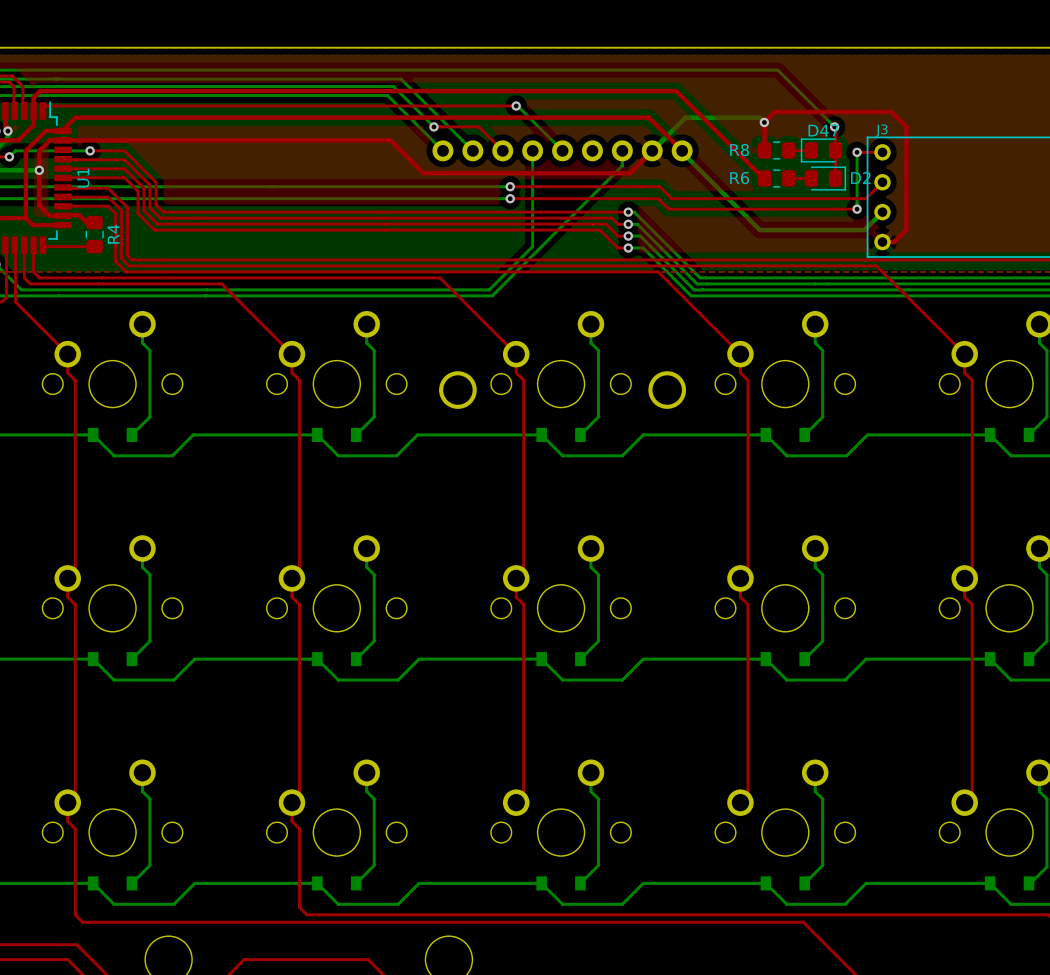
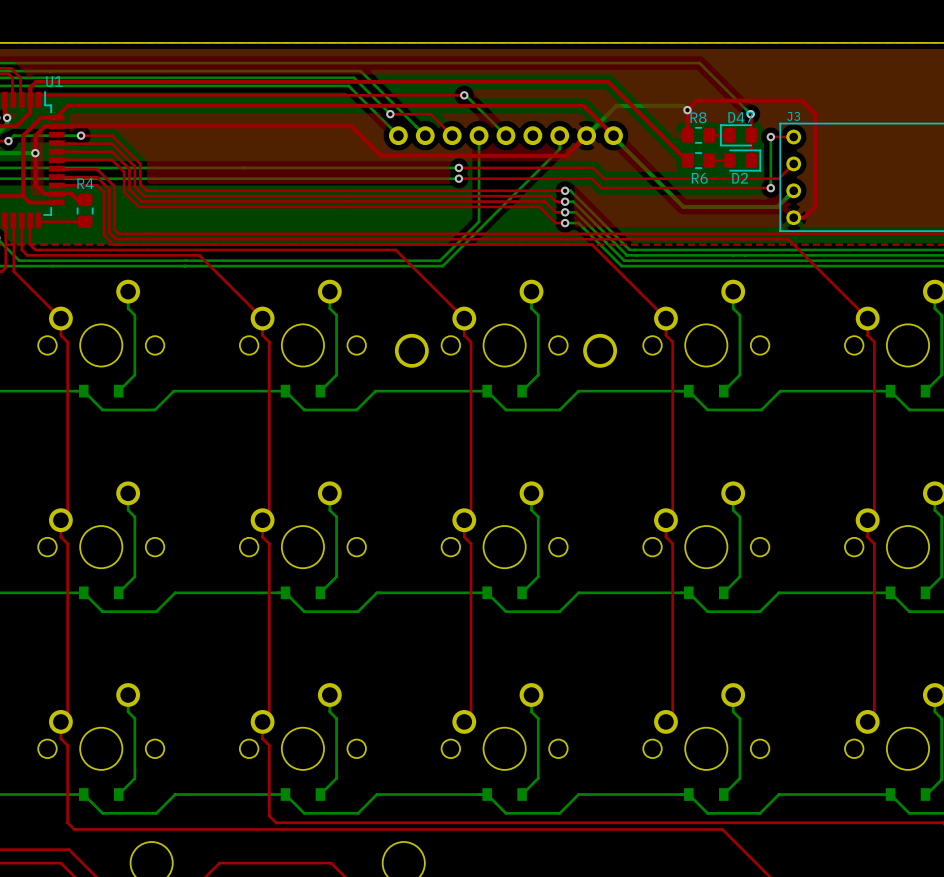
R8 name position: R8 (739, 150) -> R8 (698, 117)
D2 name position: D2 (860, 177) -> D2 (740, 178)
U1 name rotation: 0° (83, 178) -> 90° clockwise (54, 81)
U1 name position: U1 (83, 178) -> U1 (54, 81)
R6 name position: R6 (739, 178) -> R6 (699, 178)
R4 name rotation: 0° (113, 234) -> 90° clockwise (85, 183)
R4 name position: R4 (113, 234) -> R4 (85, 183)

